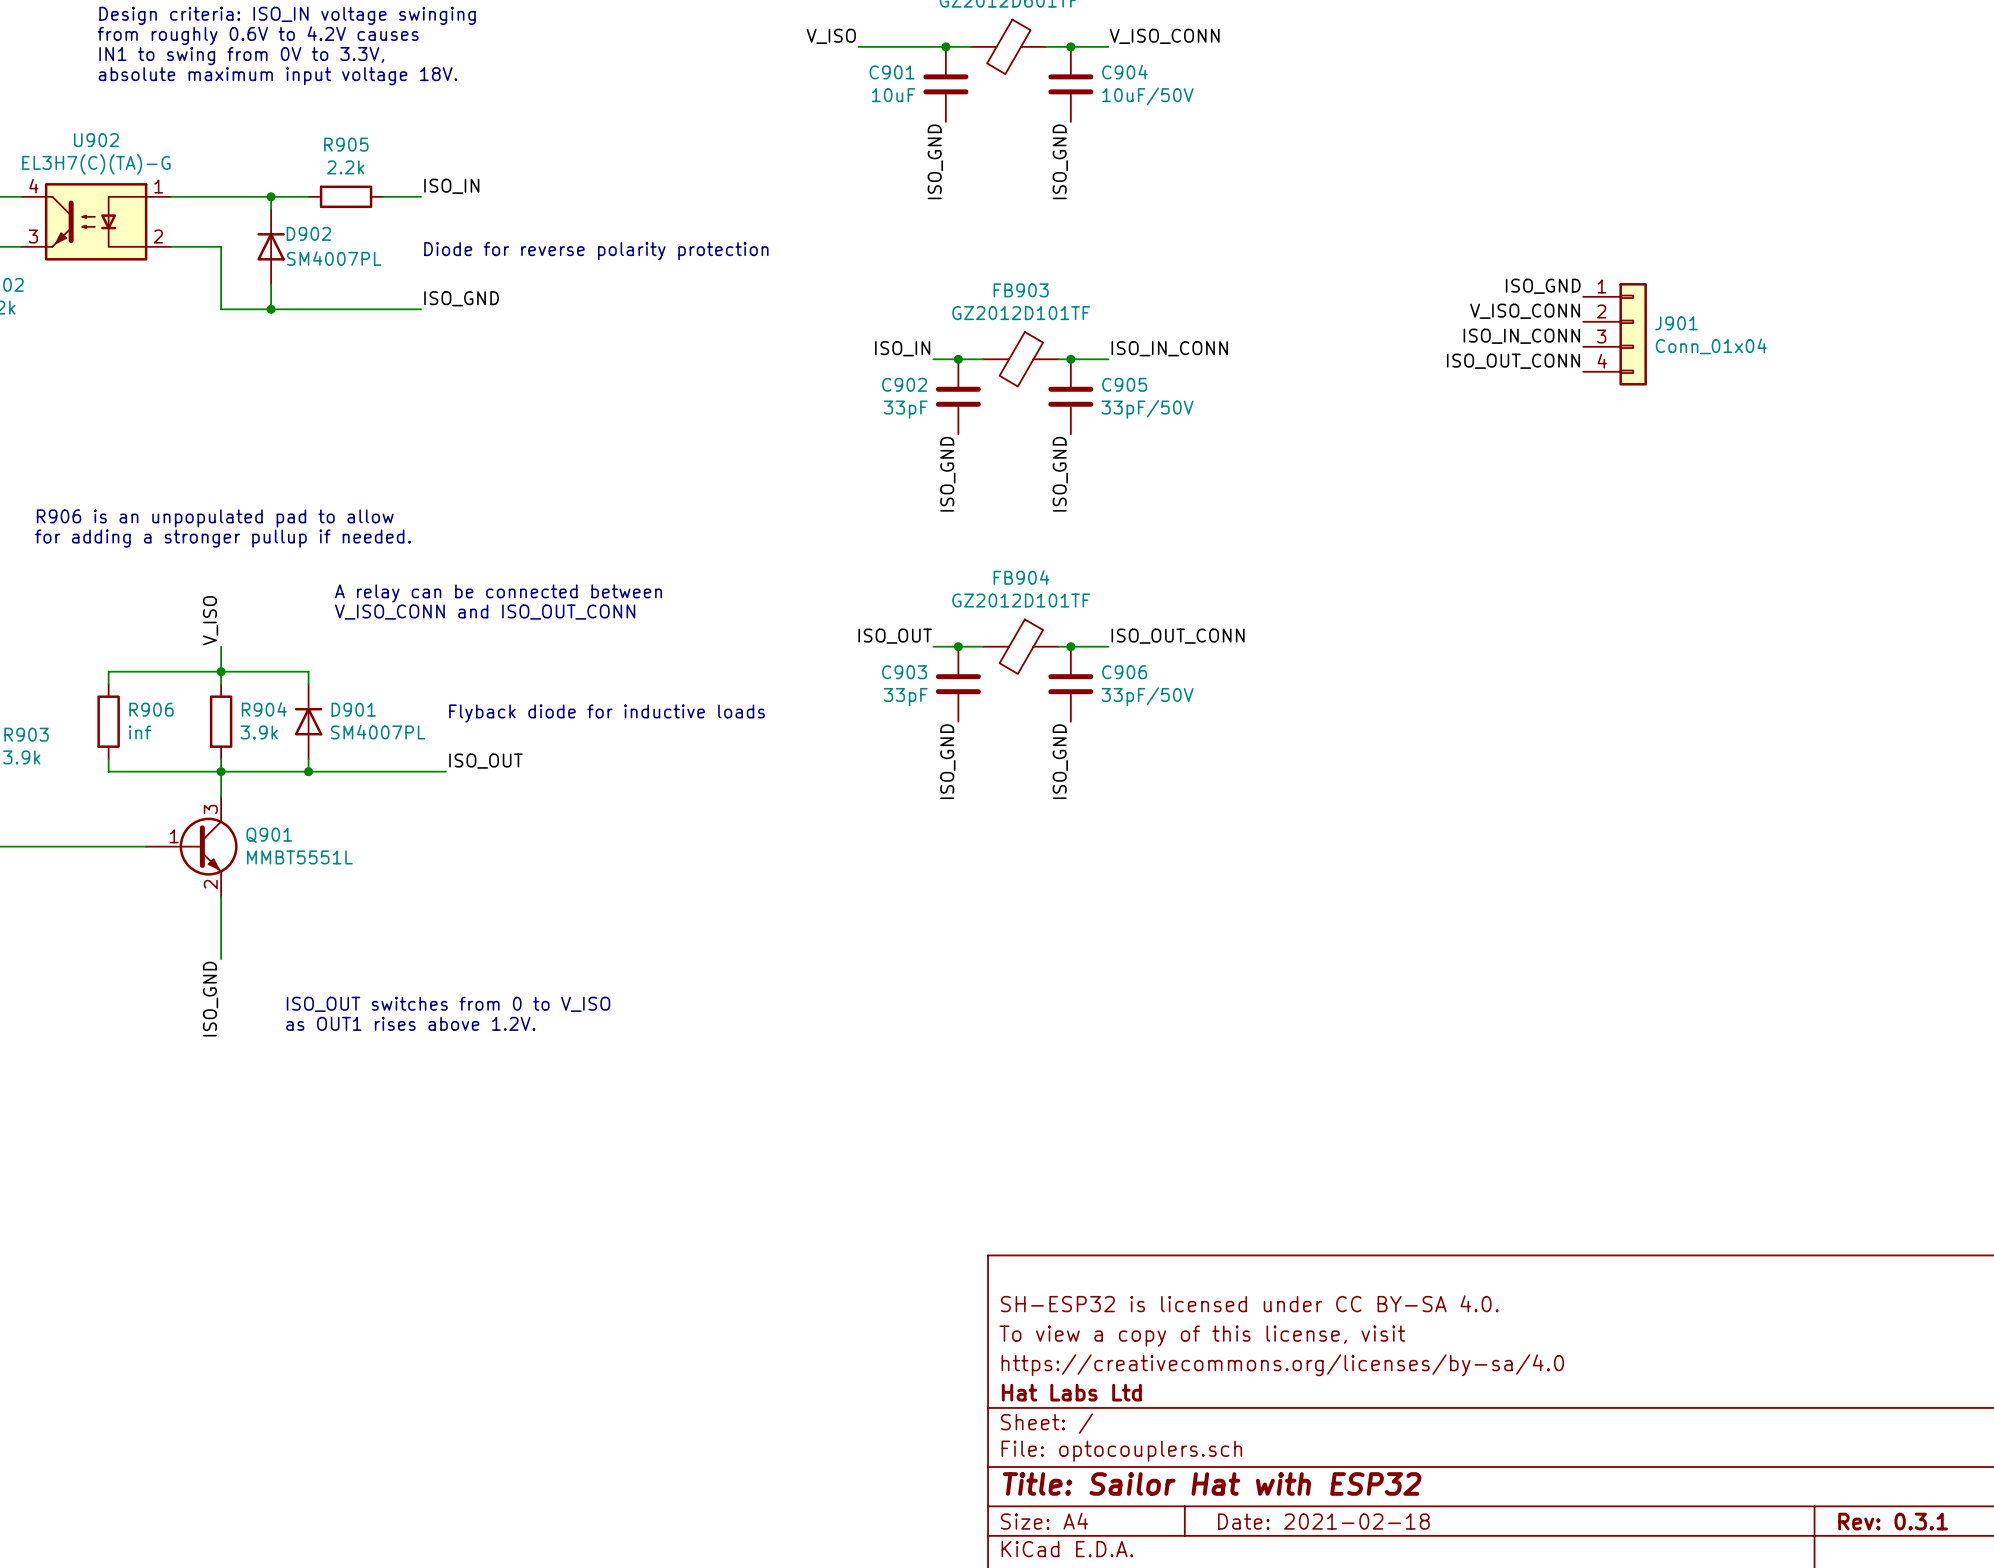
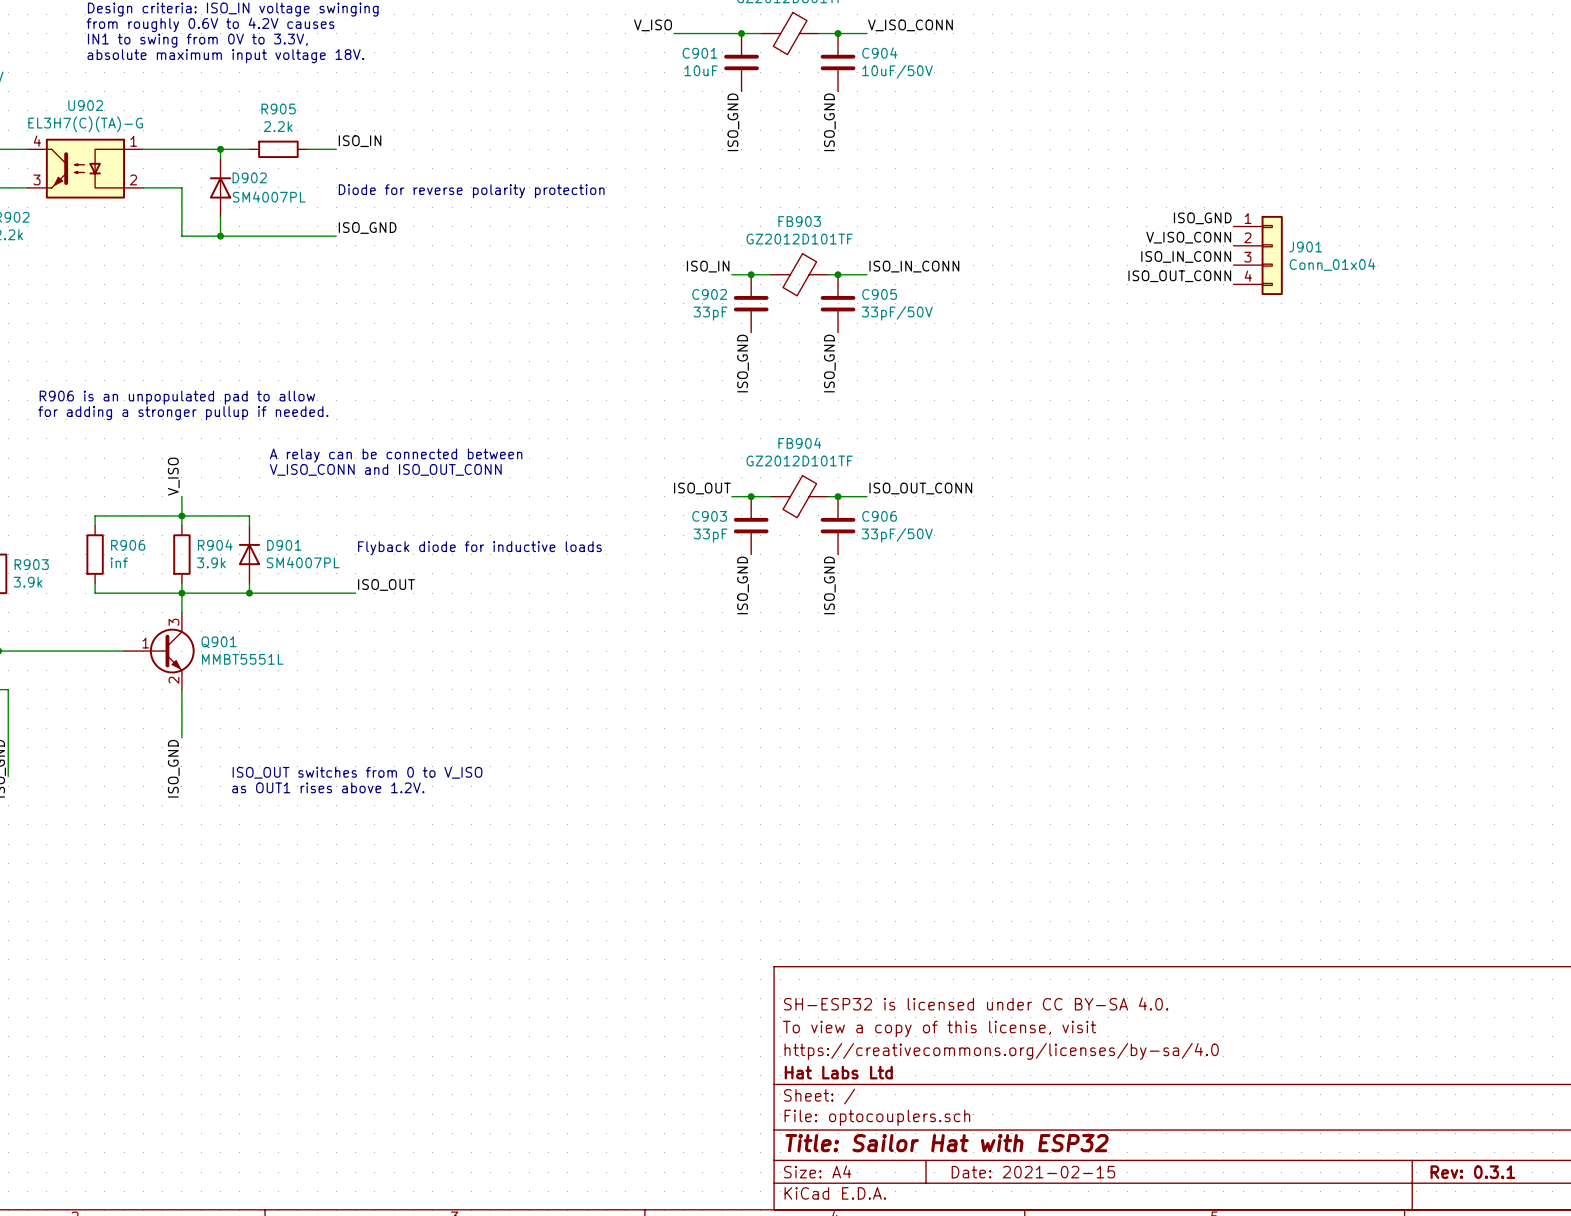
title block: Date: 2021-02-18 (1323, 1521) -> Date: 2021-02-15 (1033, 1172)

